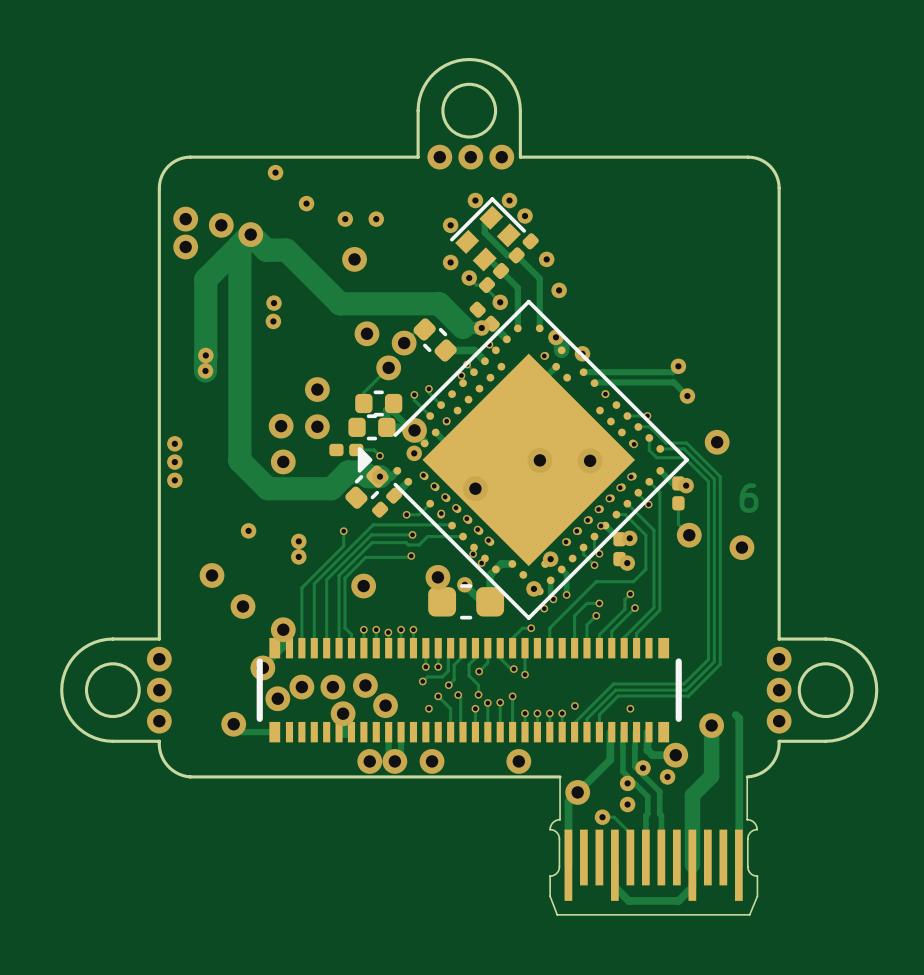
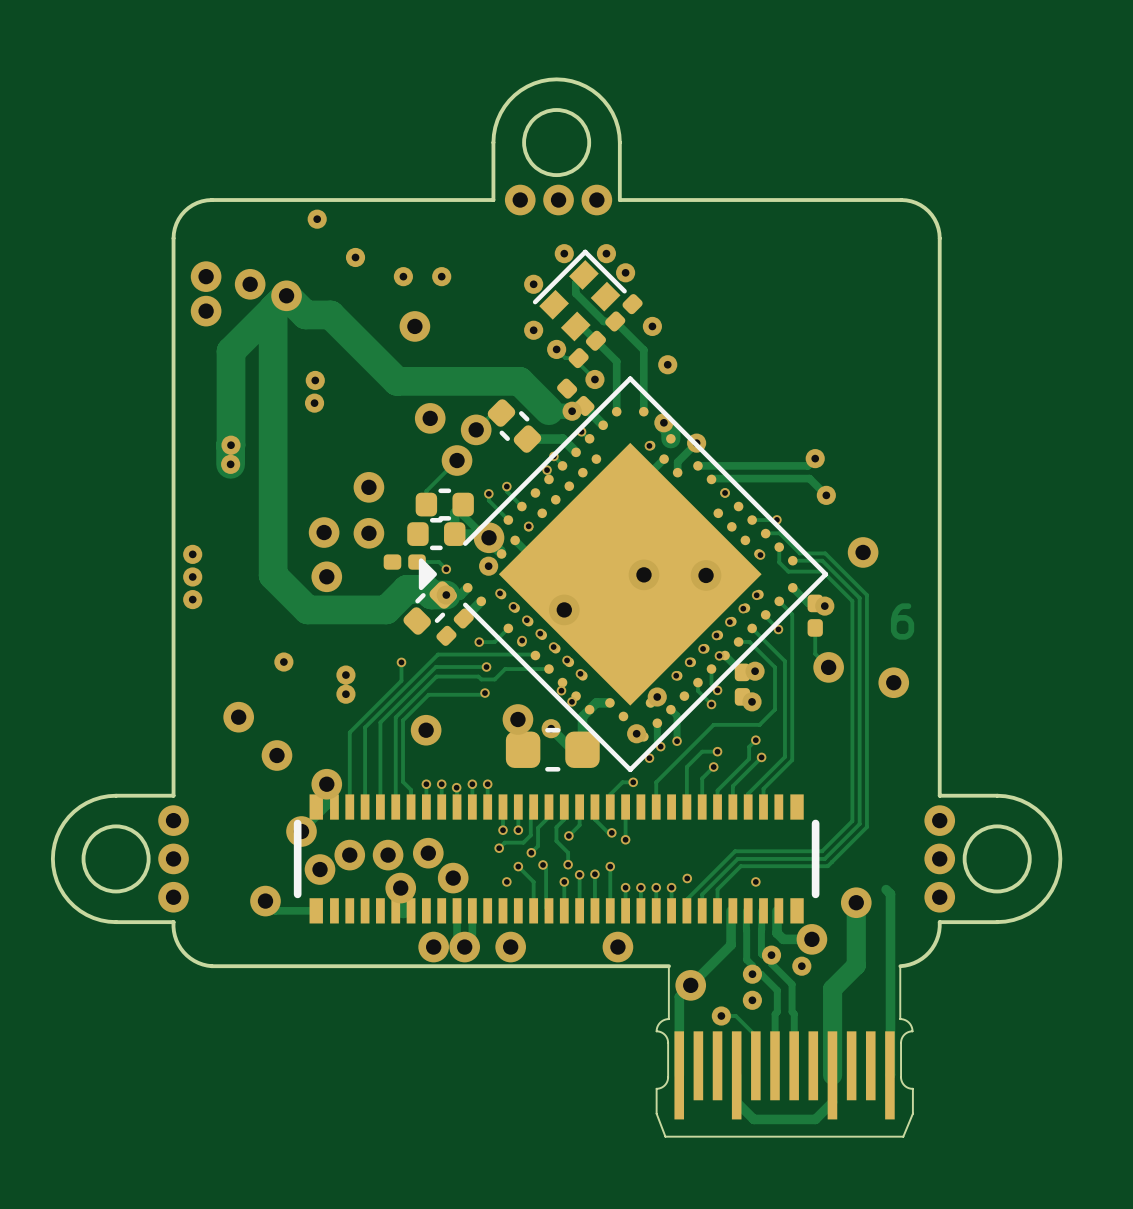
track: none -> (696, 443) (677, 462) (677, 472)

